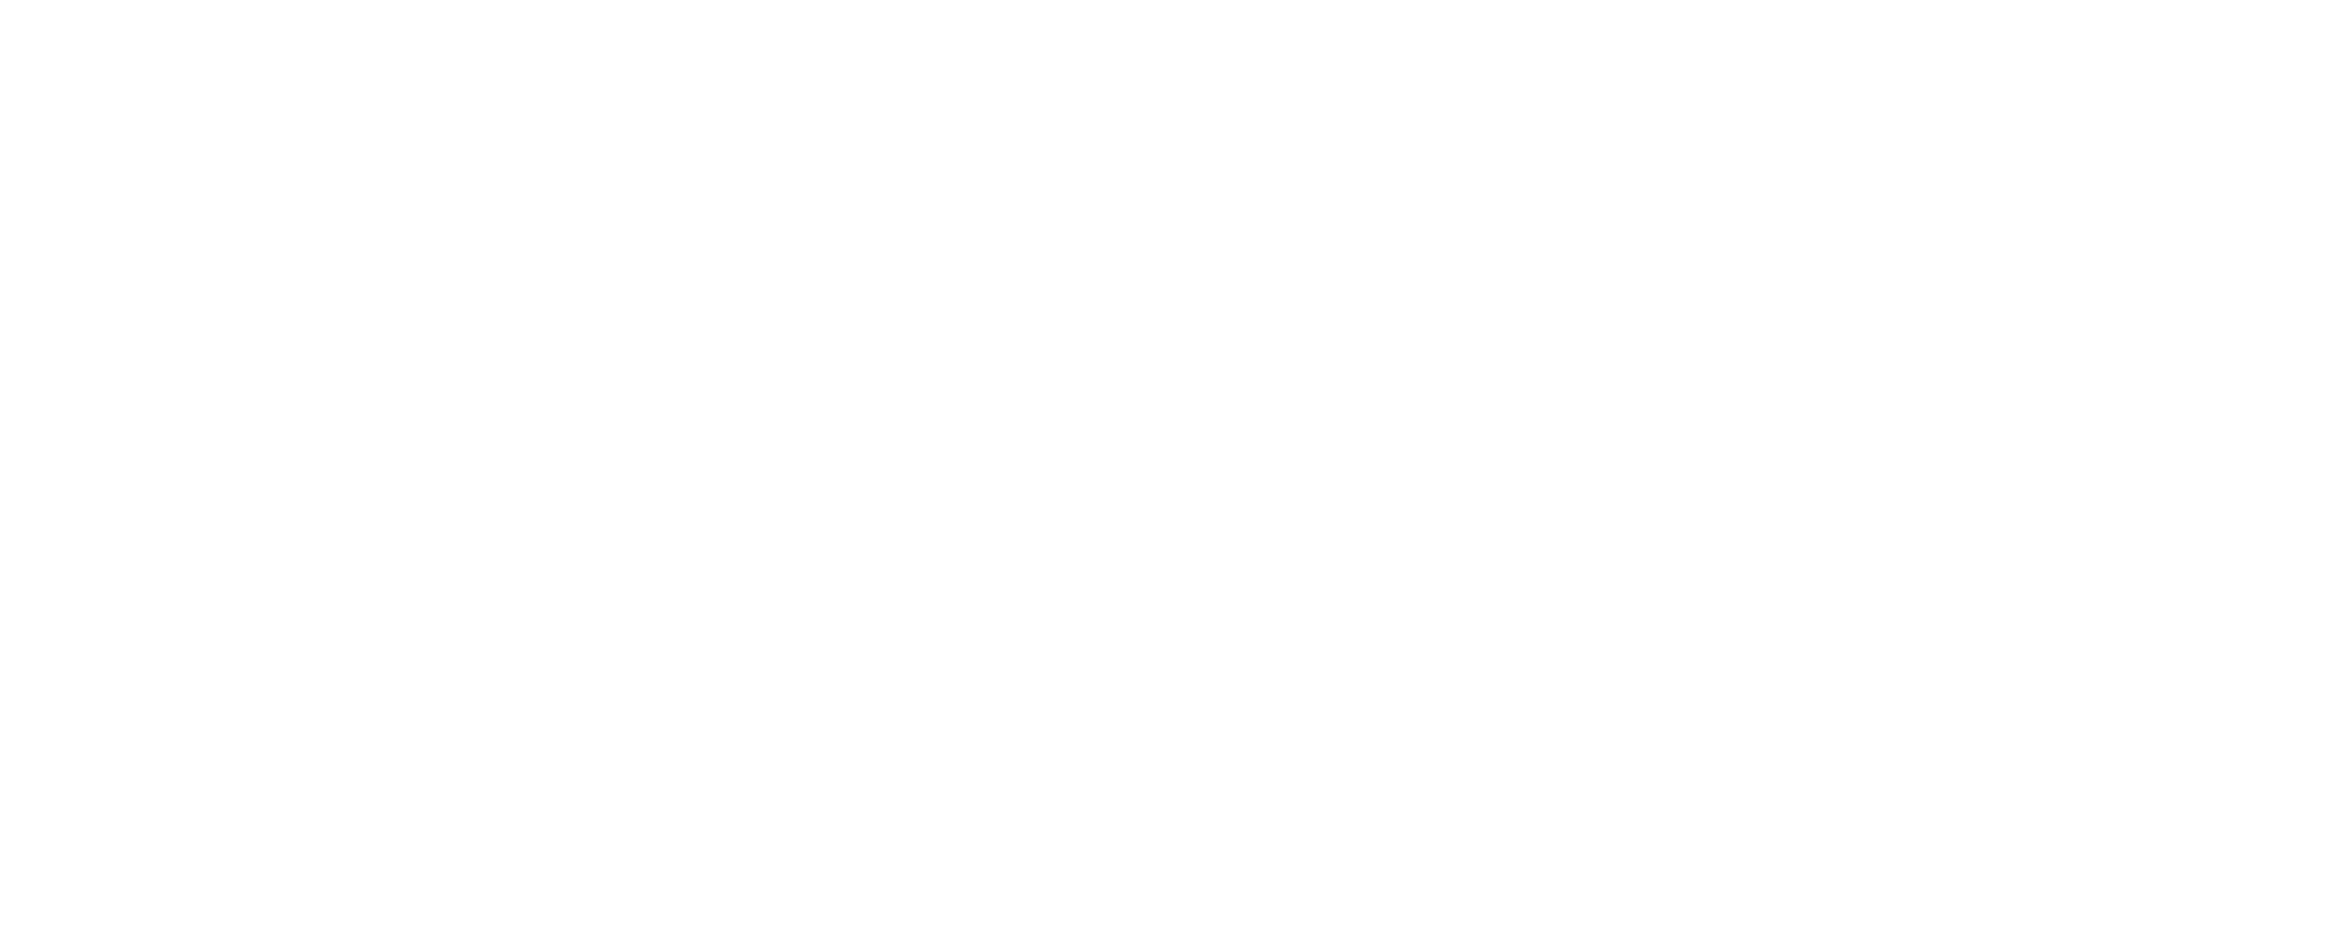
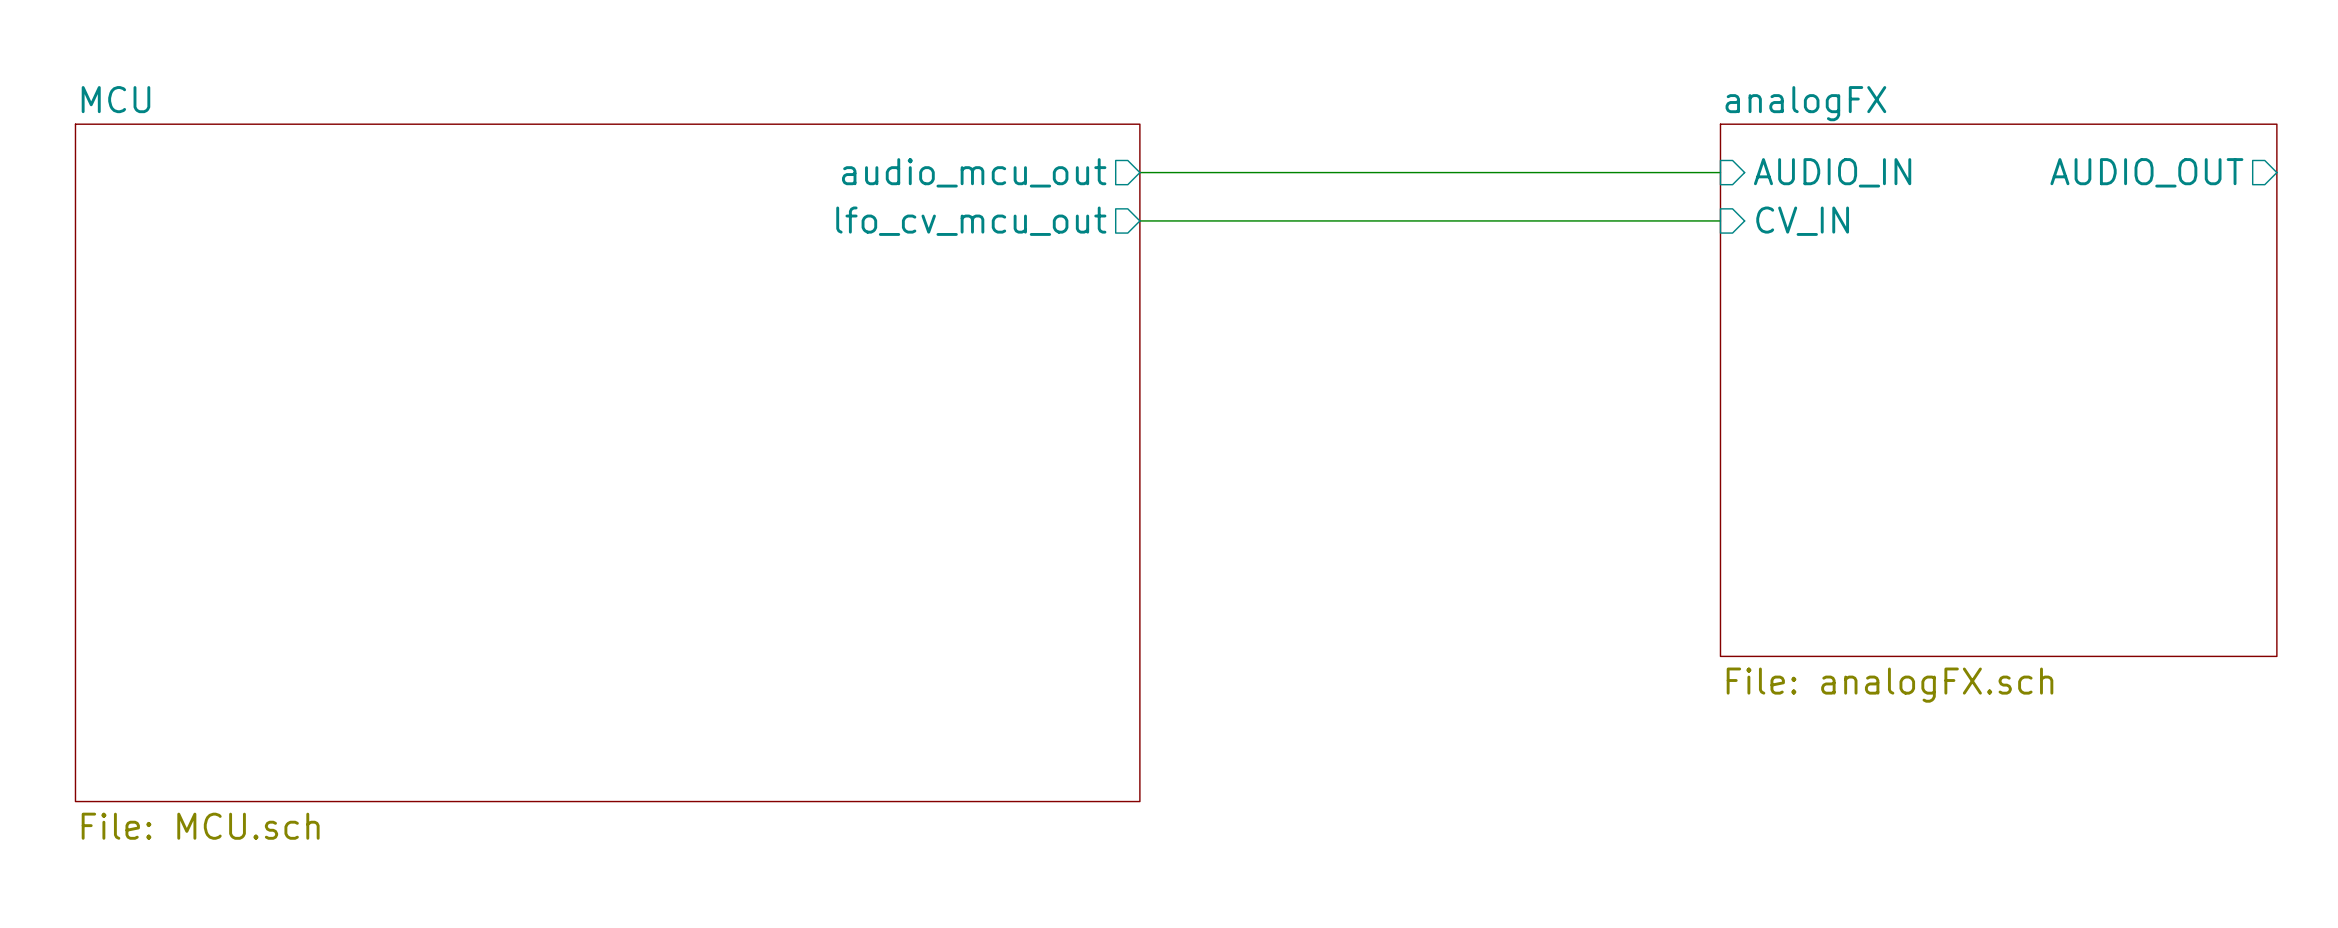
sheet pin: none -> audio_mcu_out (974, 172)
wire: none -> (1139, 172) (1720, 172)
sheet pin: none -> AUDIO_IN (1832, 172)
sheet pin: none -> AUDIO_OUT (2146, 172)
wire: none -> (1139, 220) (1720, 220)
sheet pin: none -> lfo_cv_mcu_out (971, 221)
sheet pin: none -> CV_IN (1802, 221)
sheet analogFX: none -> File: analogFX.sch (1998, 390)
sheet MCU: none -> File: MCU.sch (607, 462)

